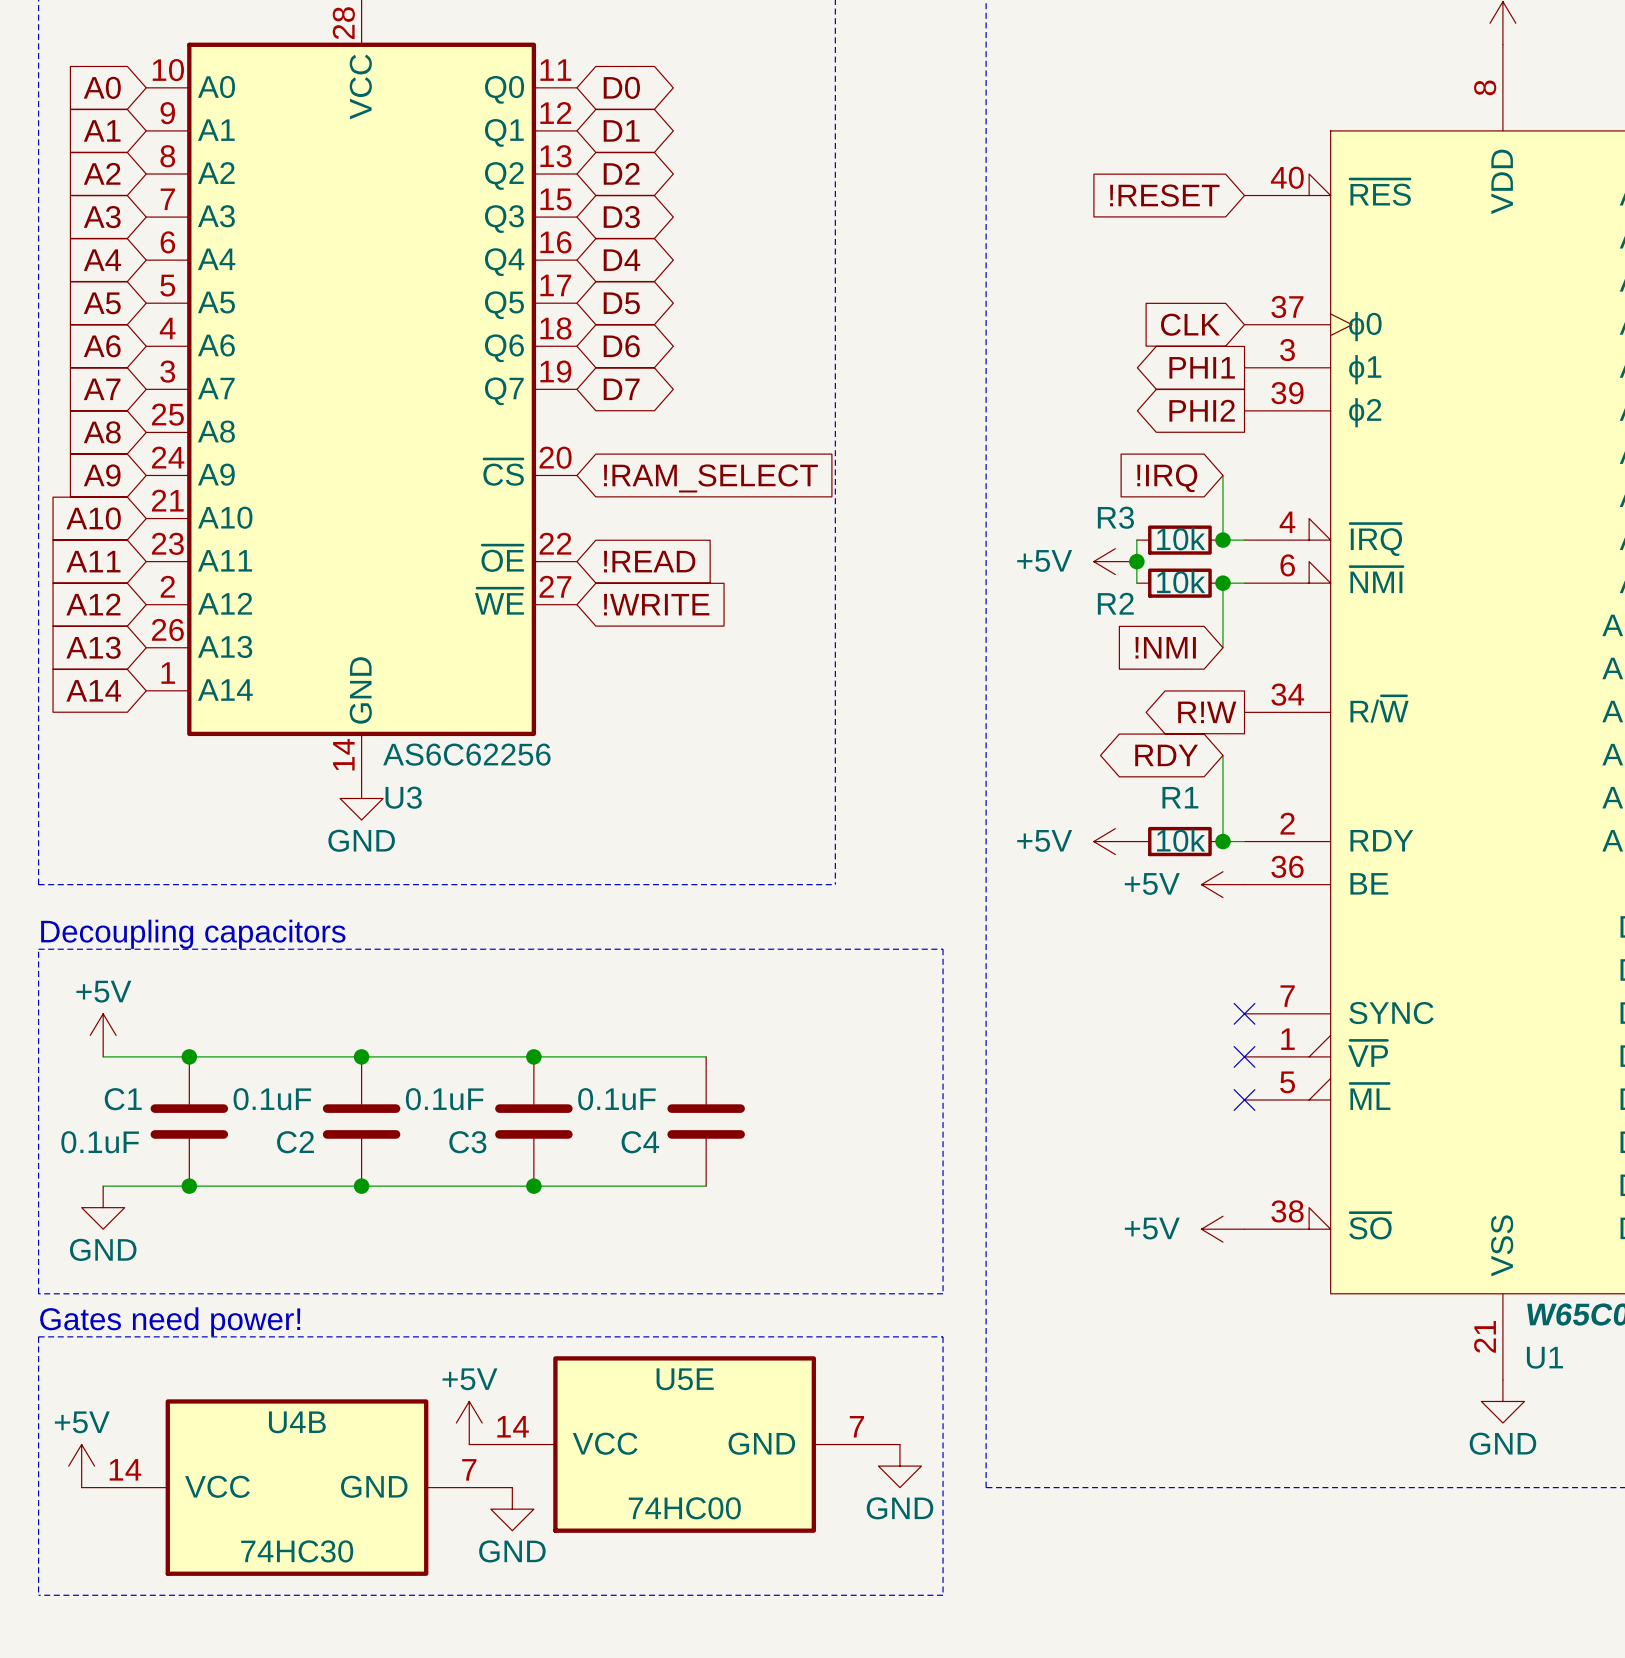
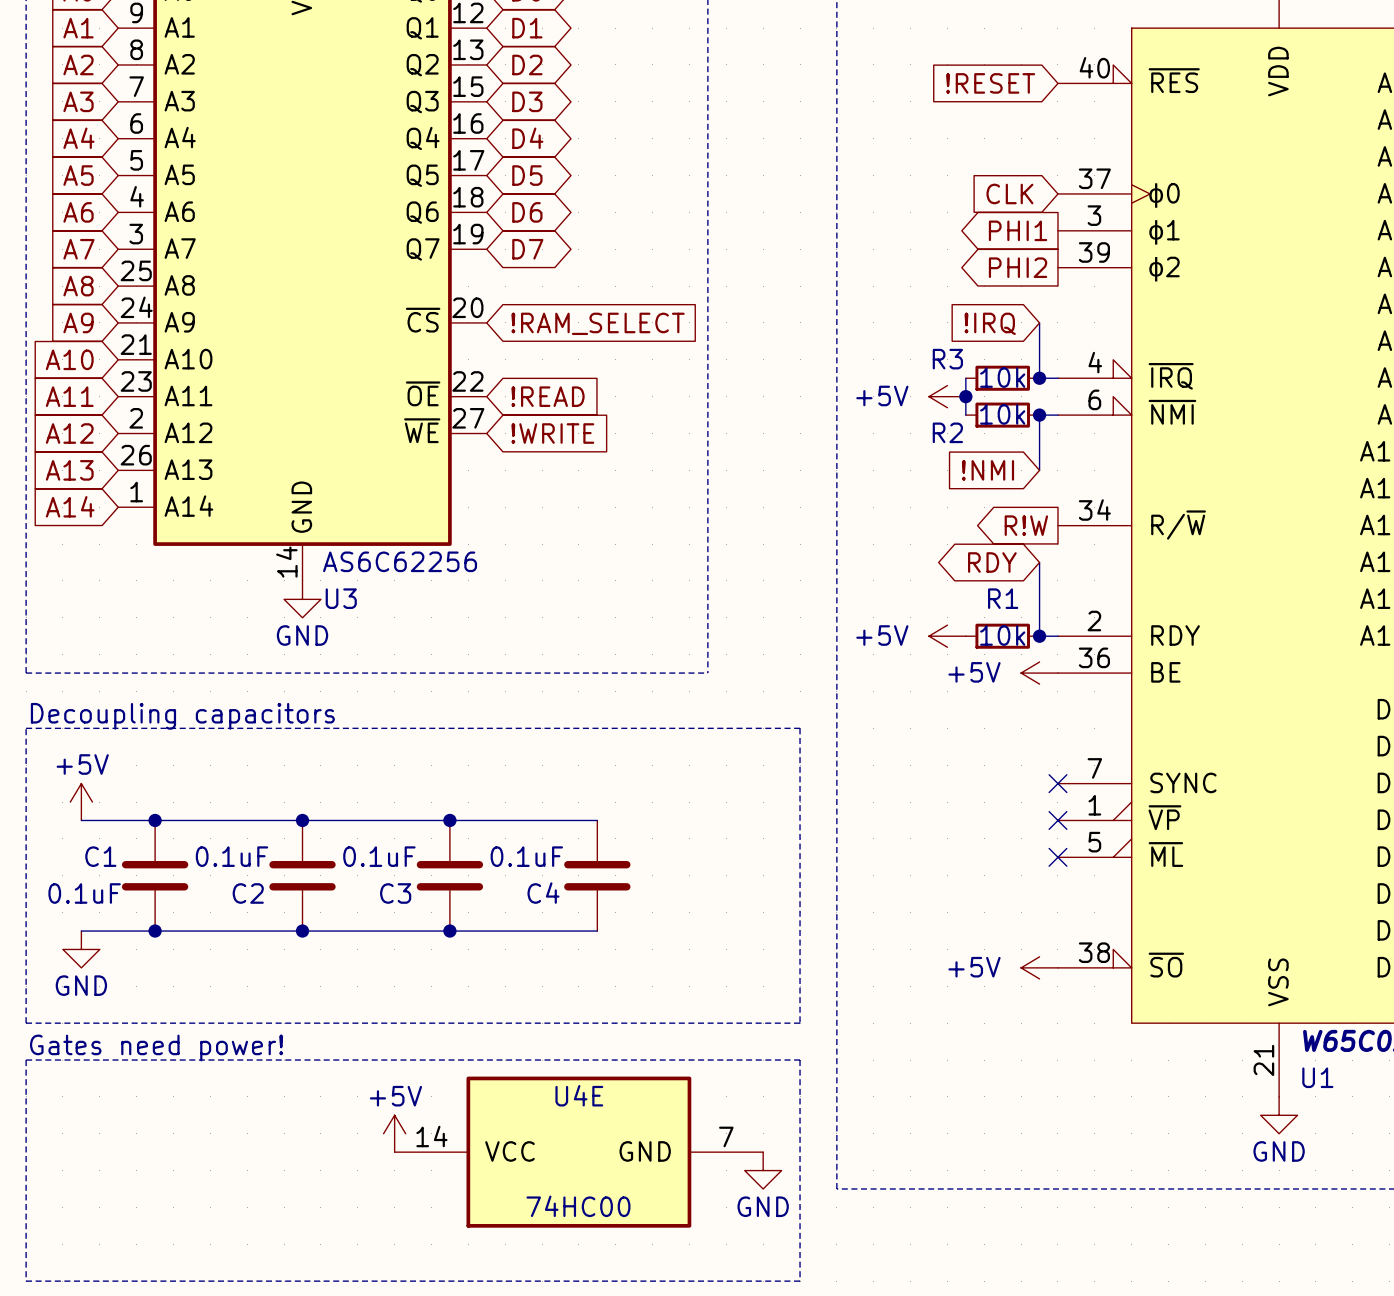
U5E name: U5E (685, 1379) -> U4E (579, 1095)
power symbol: +5V (81, 1466) -> none
U4B: 74HC30 (296, 1487) -> none
power symbol: GND (512, 1509) -> none

